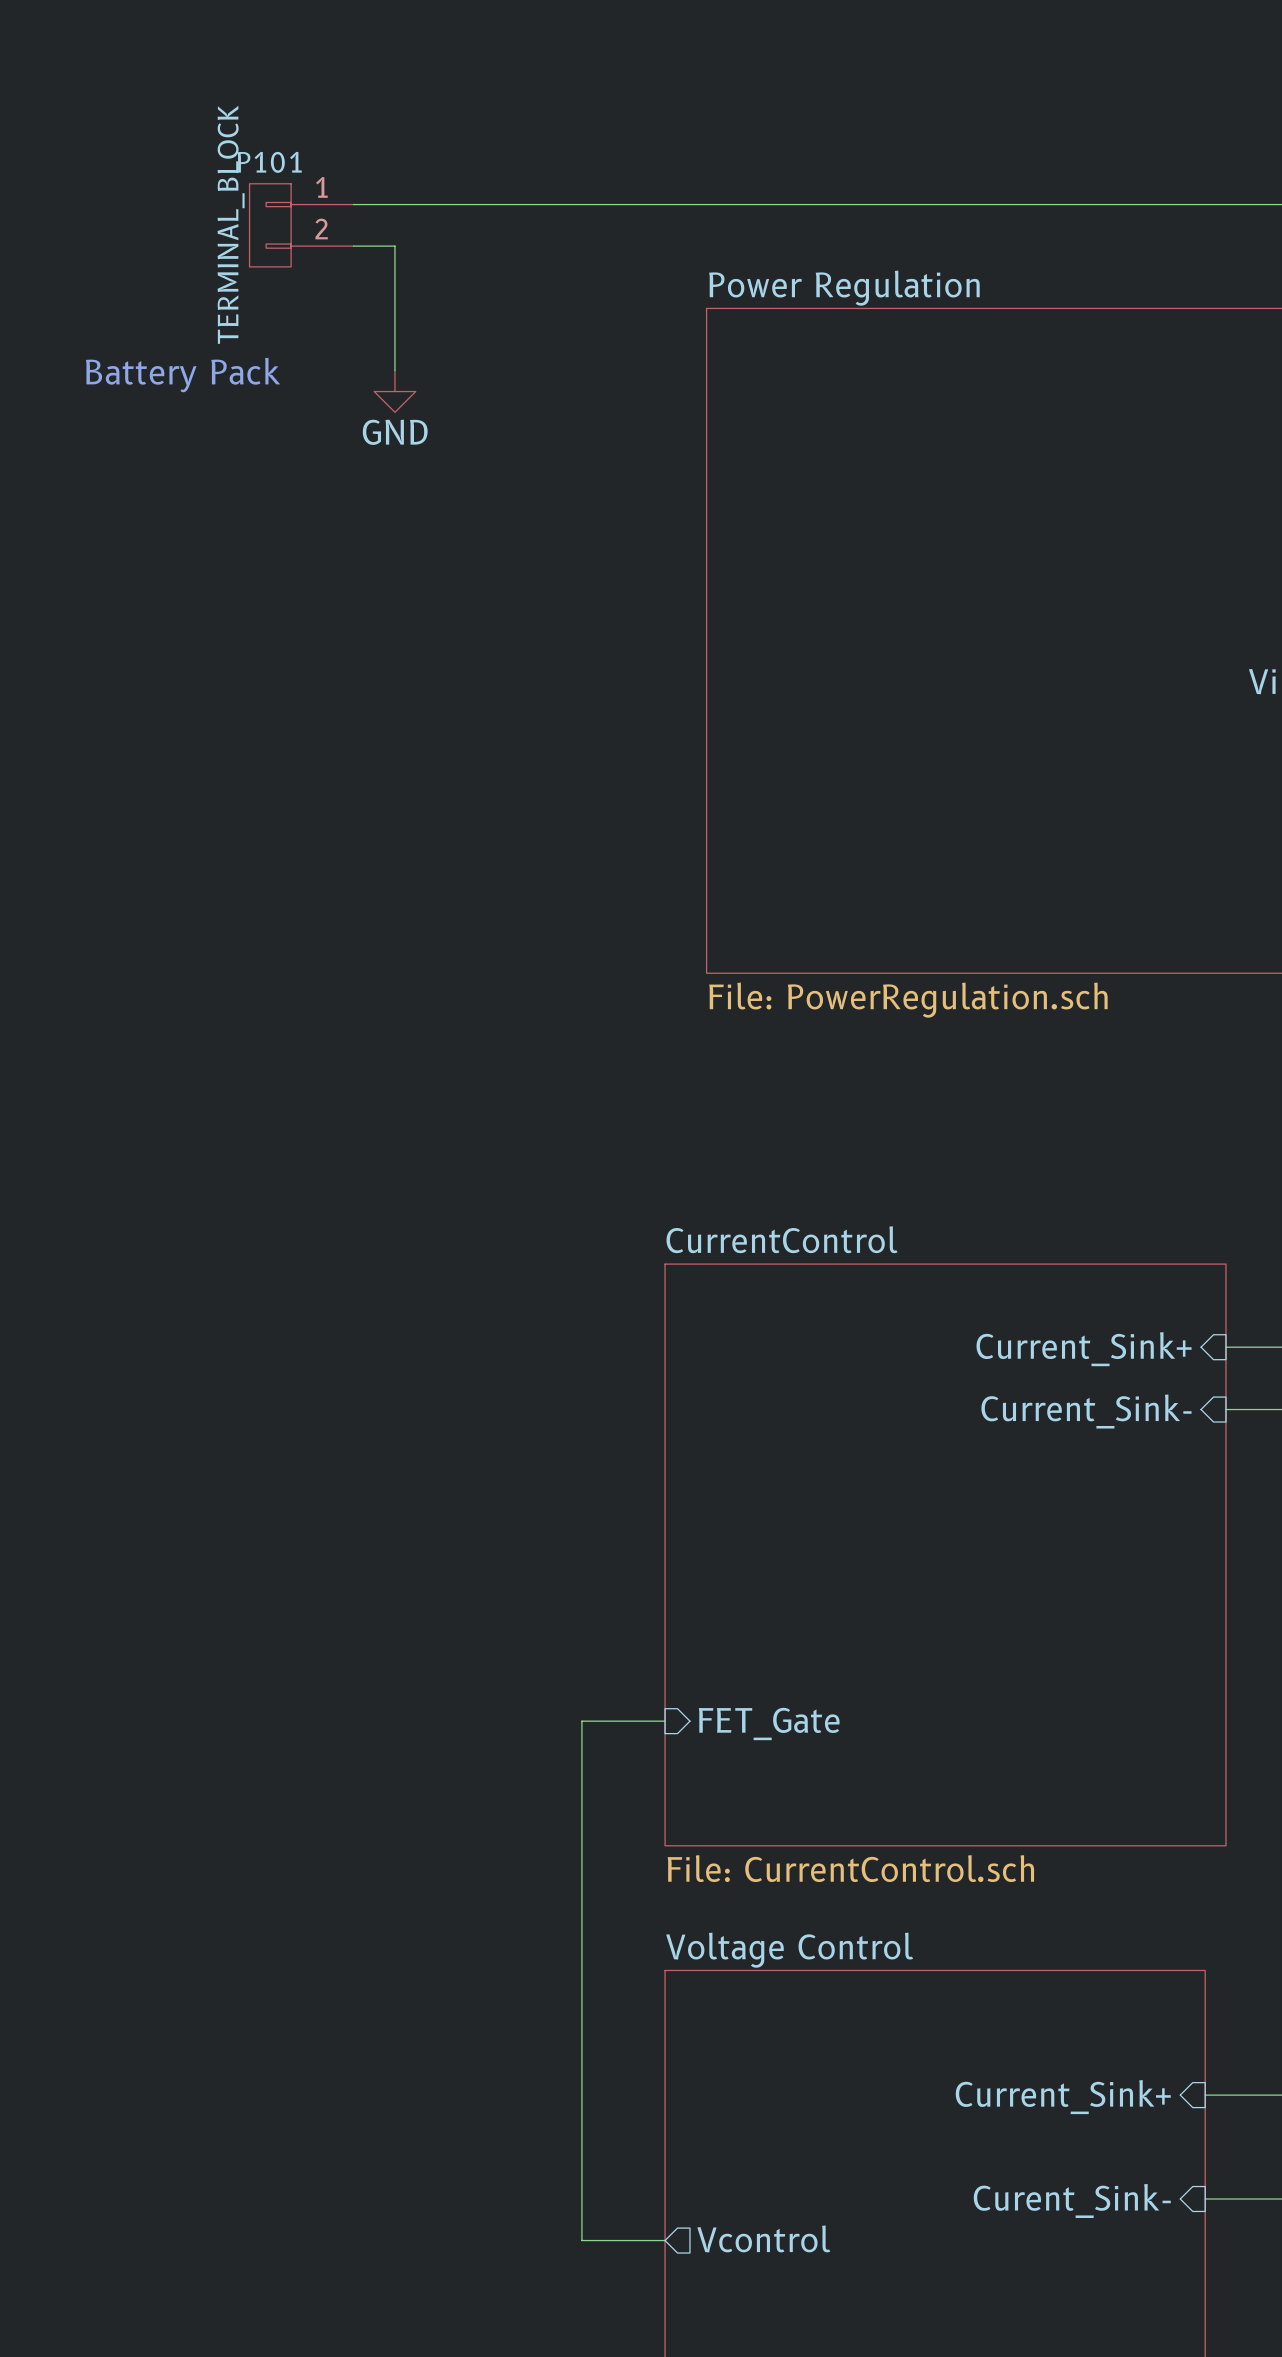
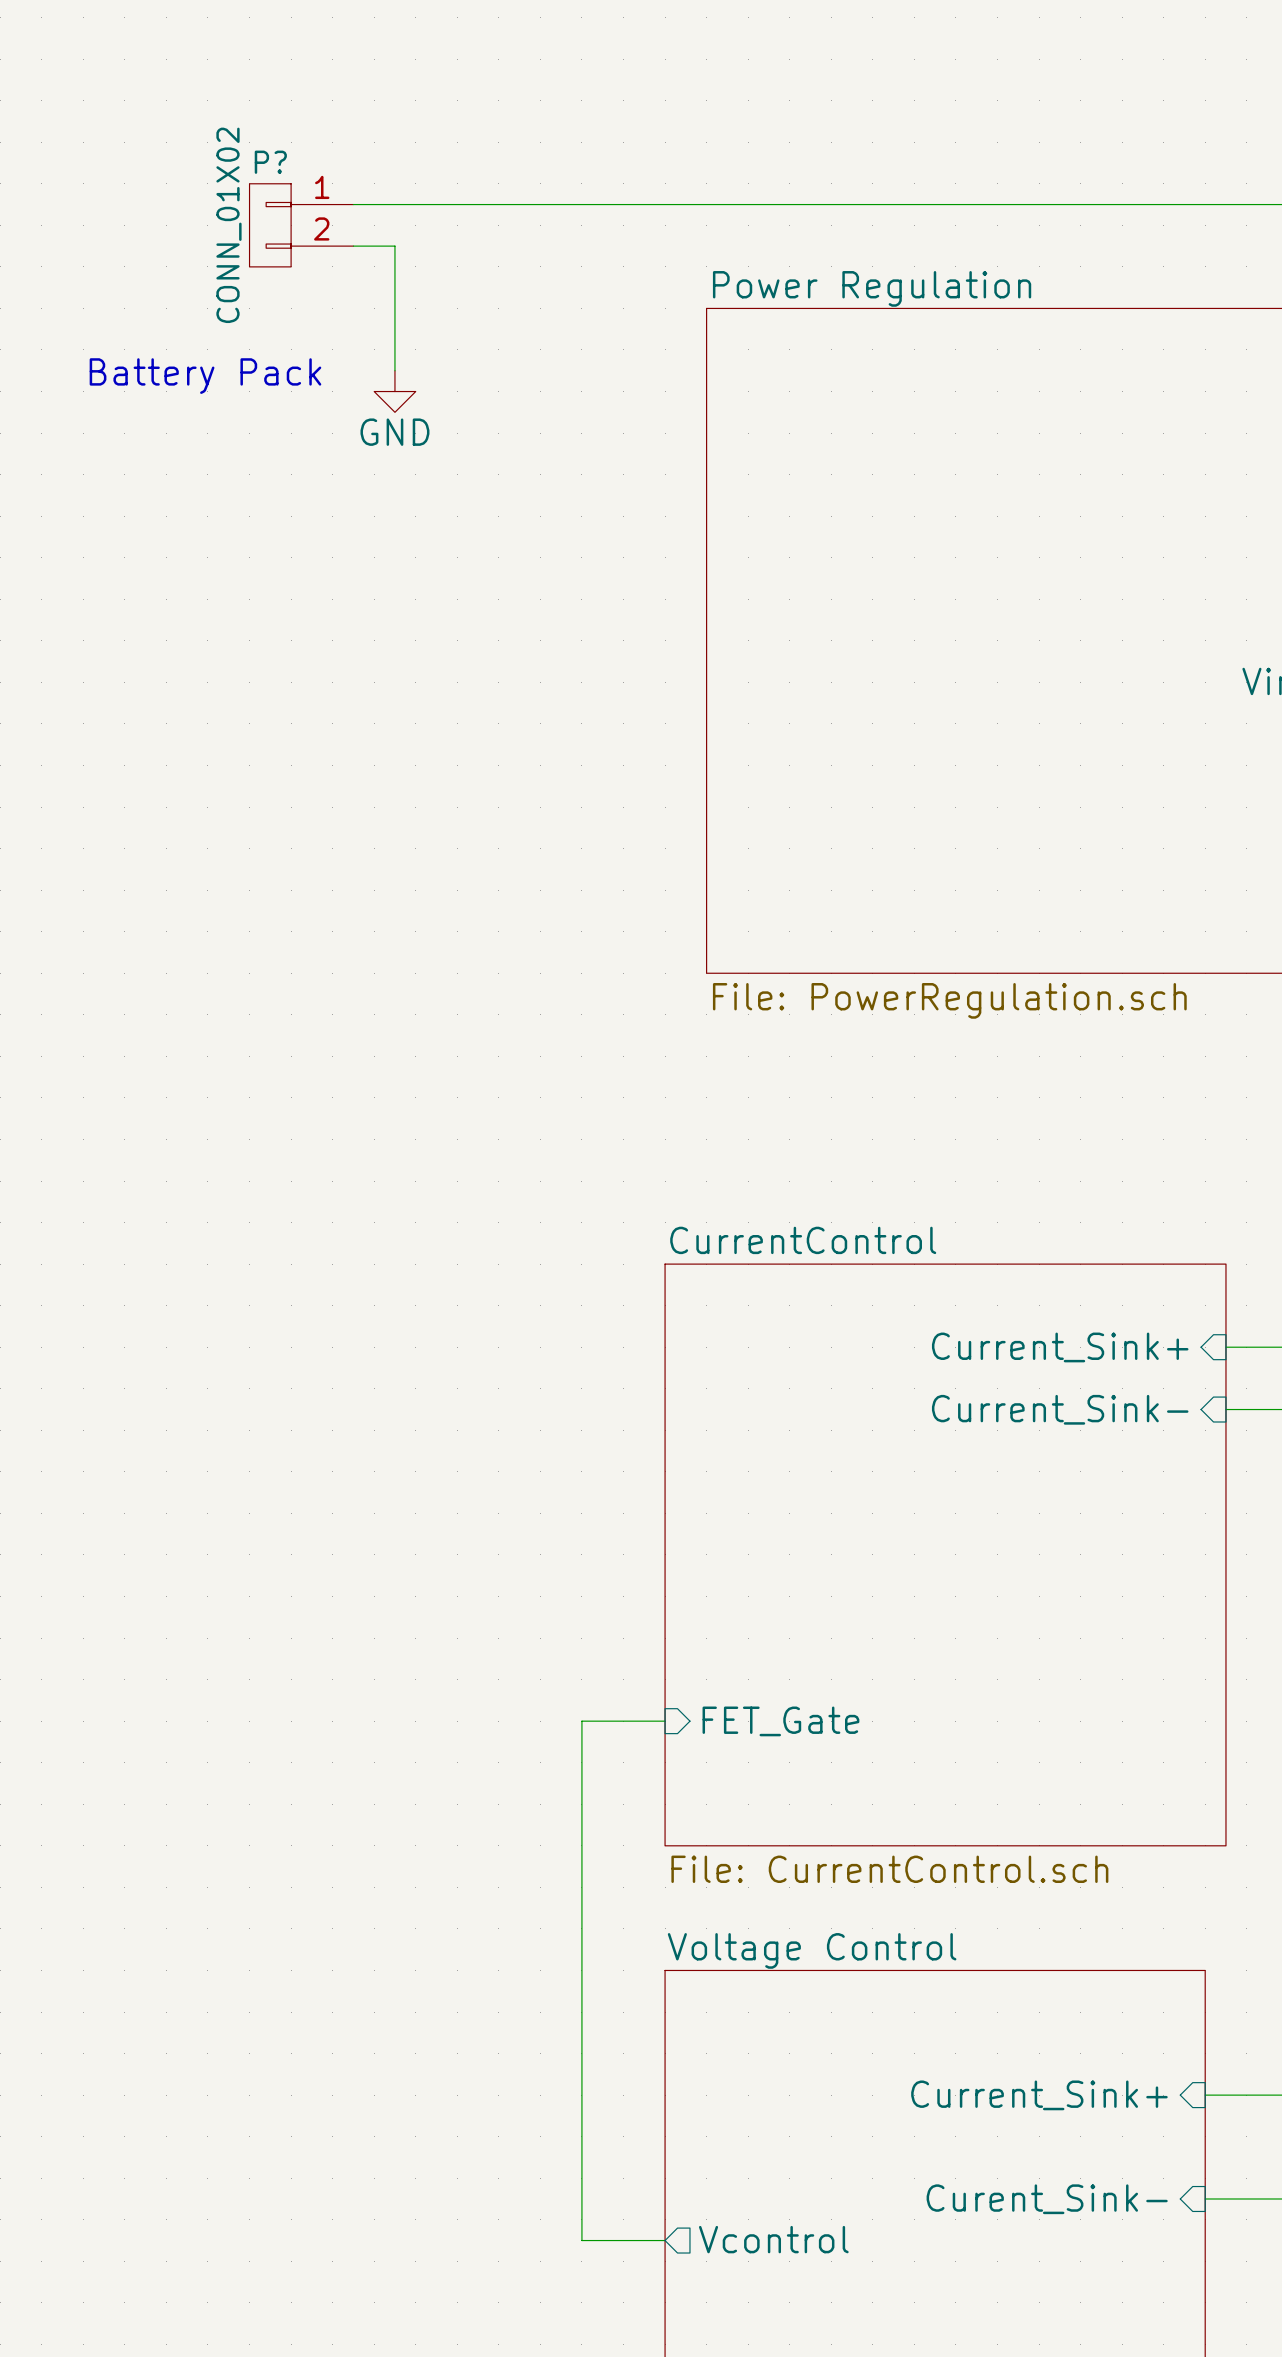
P101 name: P101 (269, 162) -> P? (270, 162)
P101 value: TERMINAL_BLOCK (231, 224) -> CONN_01X02 (228, 225)

